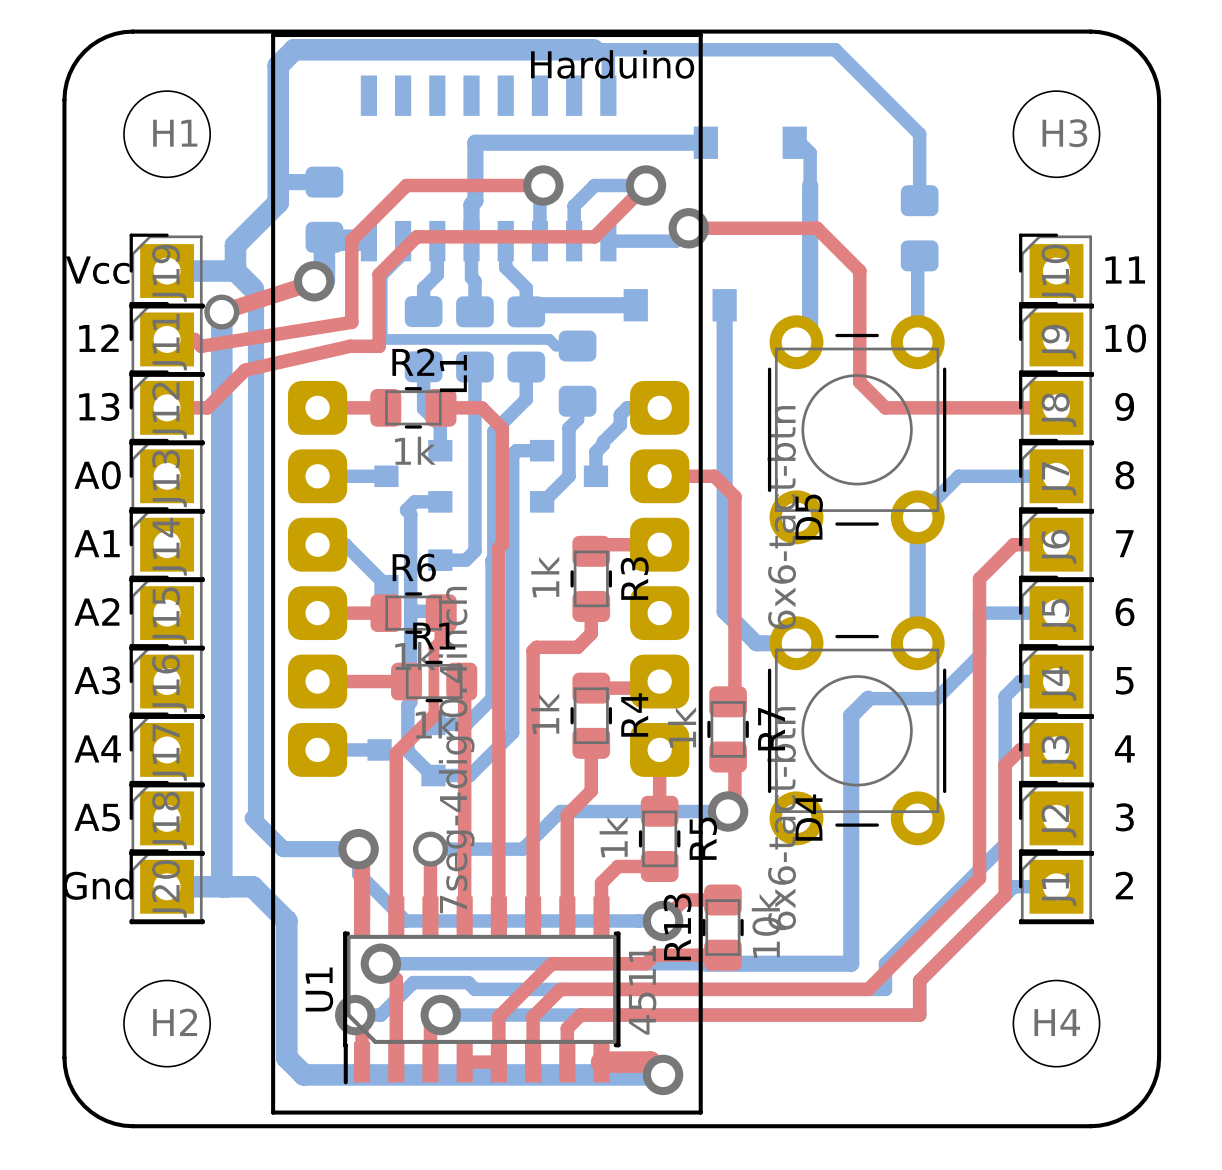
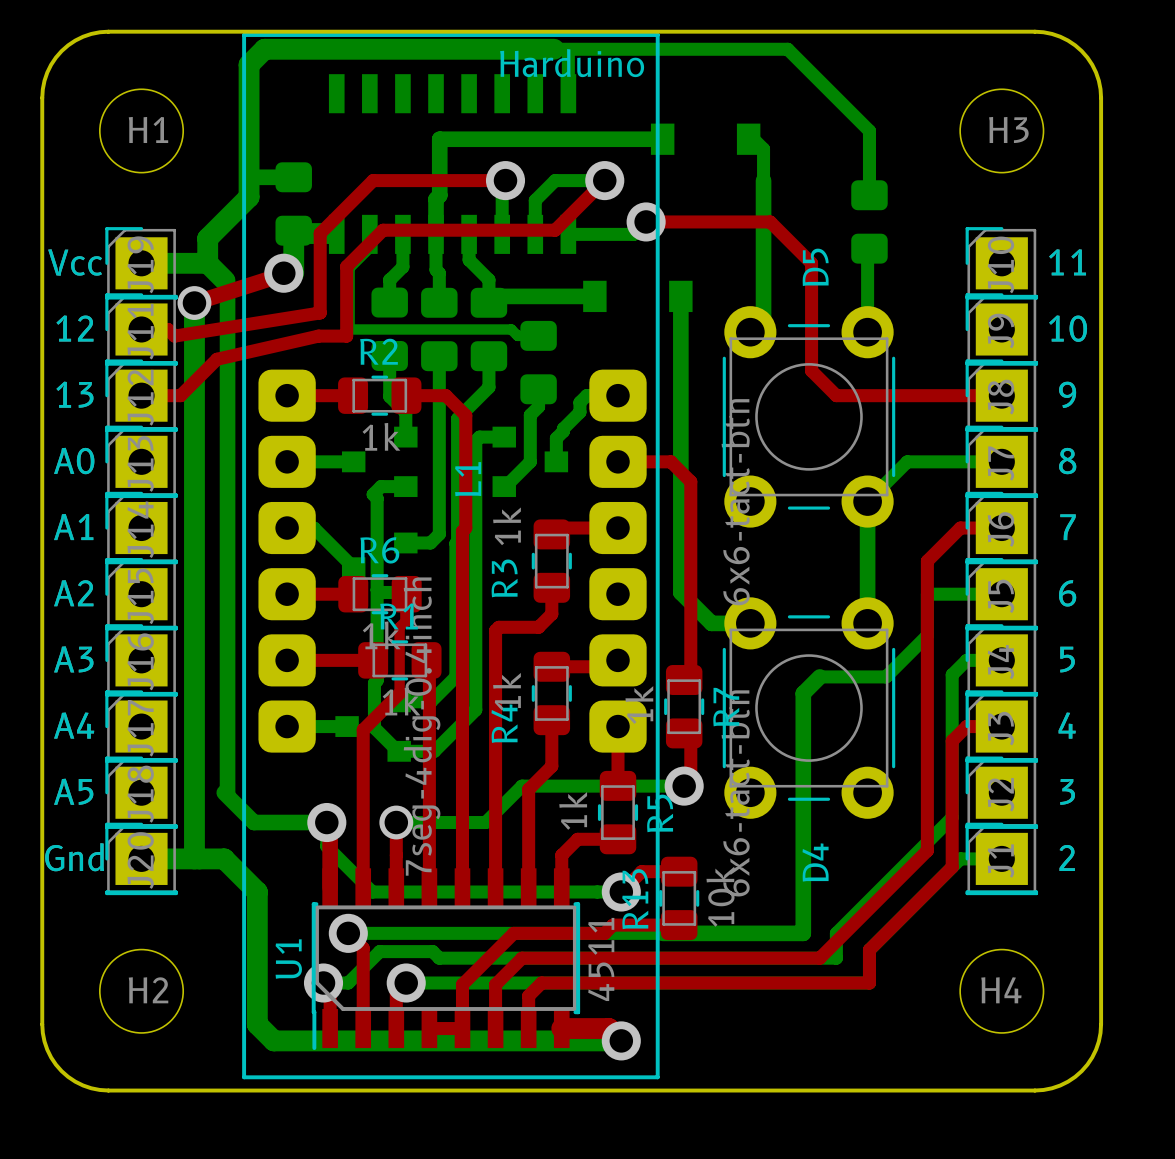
L1 name position: L1 (453, 373) -> L1 (468, 479)
D5 name position: D5 (809, 517) -> D5 (815, 267)
R3 value position: 1k (545, 576) -> 1k (507, 526)
R3 name position: R3 (634, 578) -> R3 (504, 578)
R4 name position: R4 (634, 714) -> R4 (504, 723)
D4 name position: D4 (808, 817) -> D4 (815, 862)

